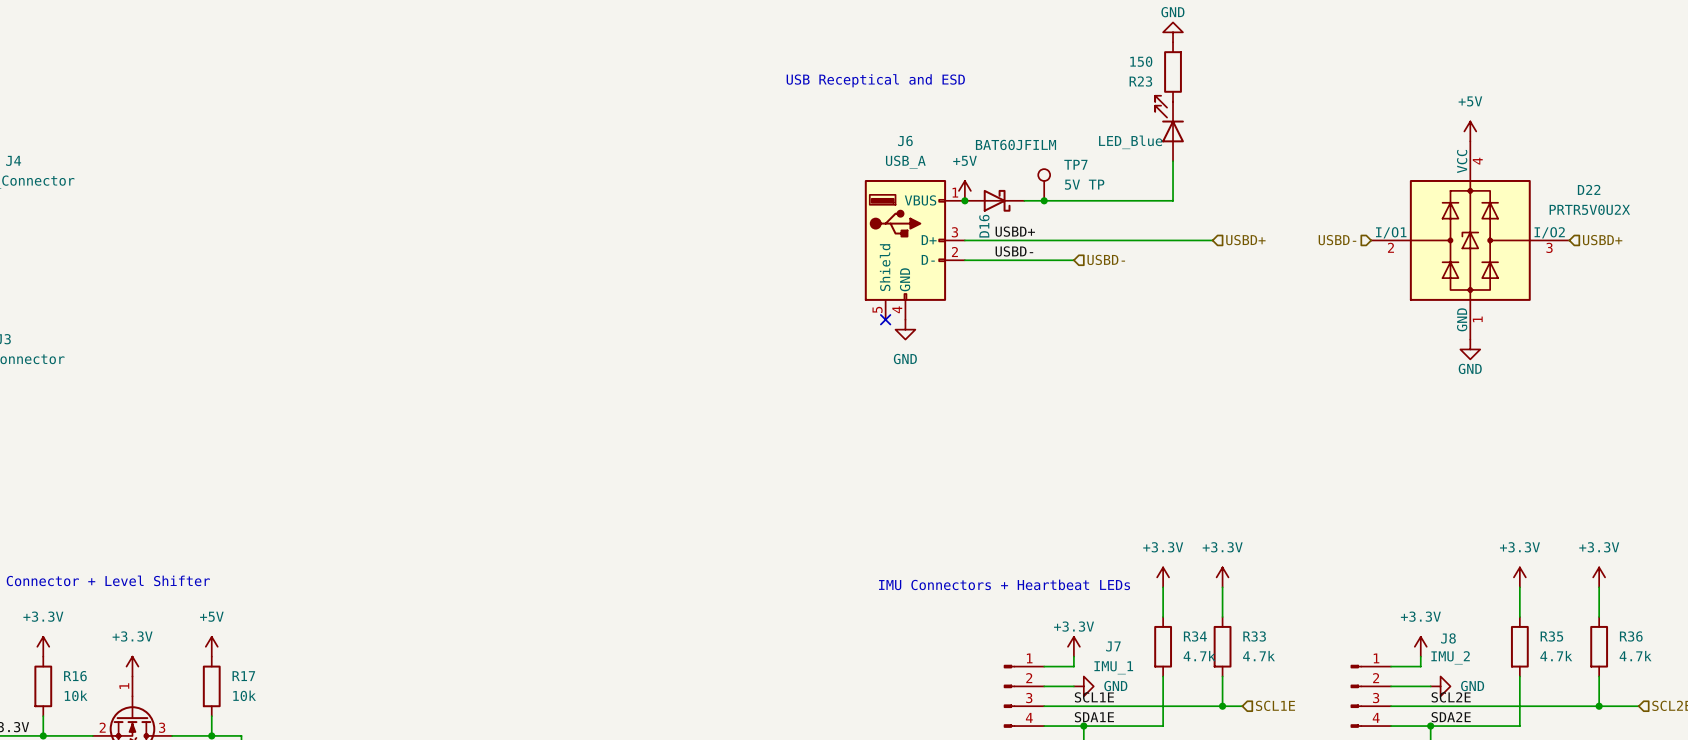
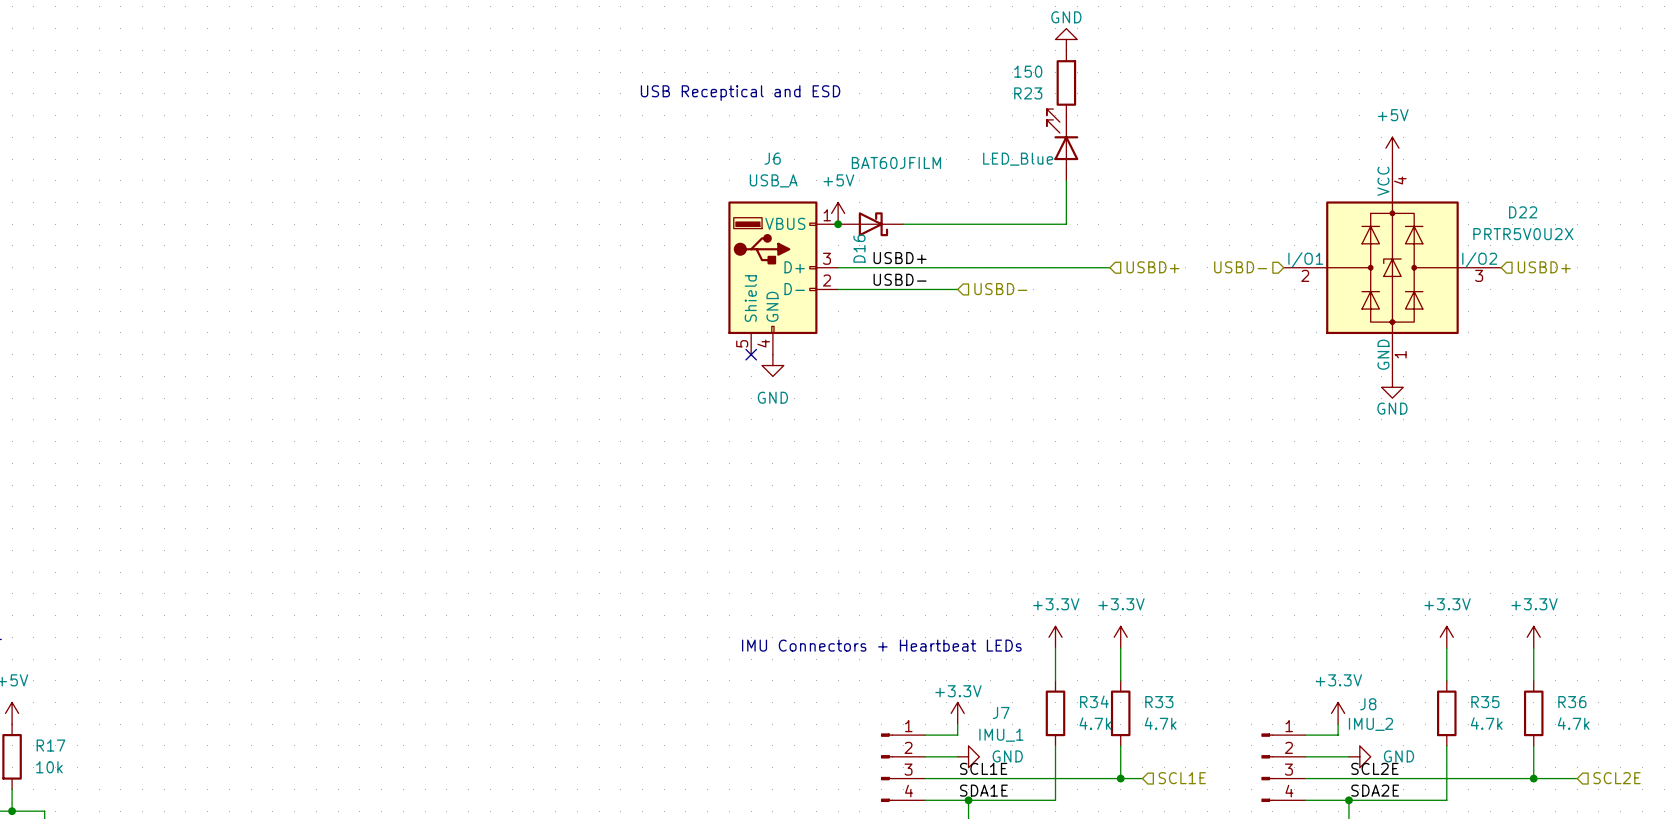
TP7: 5V TP (1044, 184) -> none
junction: (1044, 200) -> none

